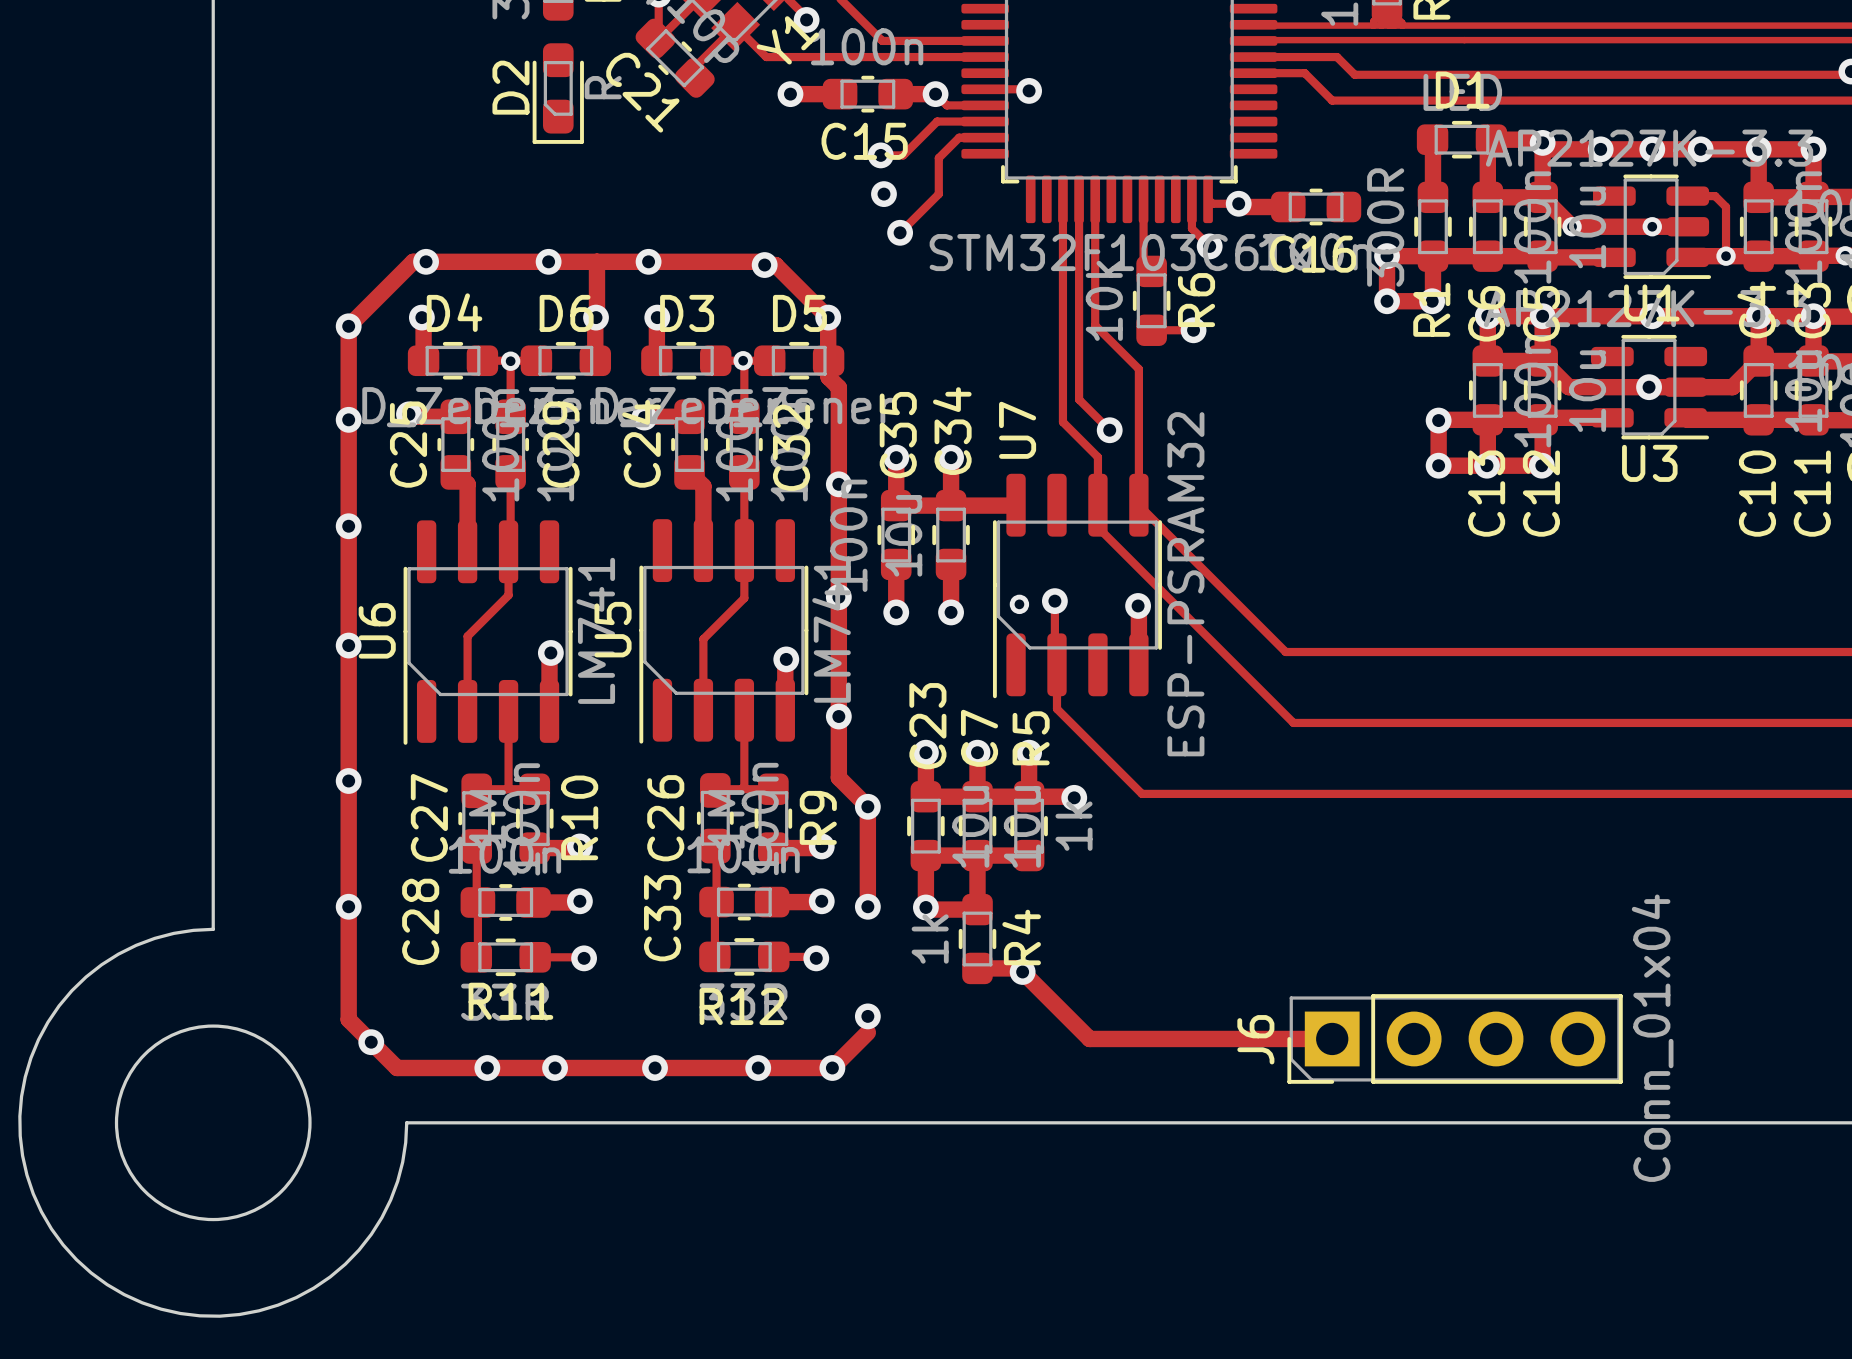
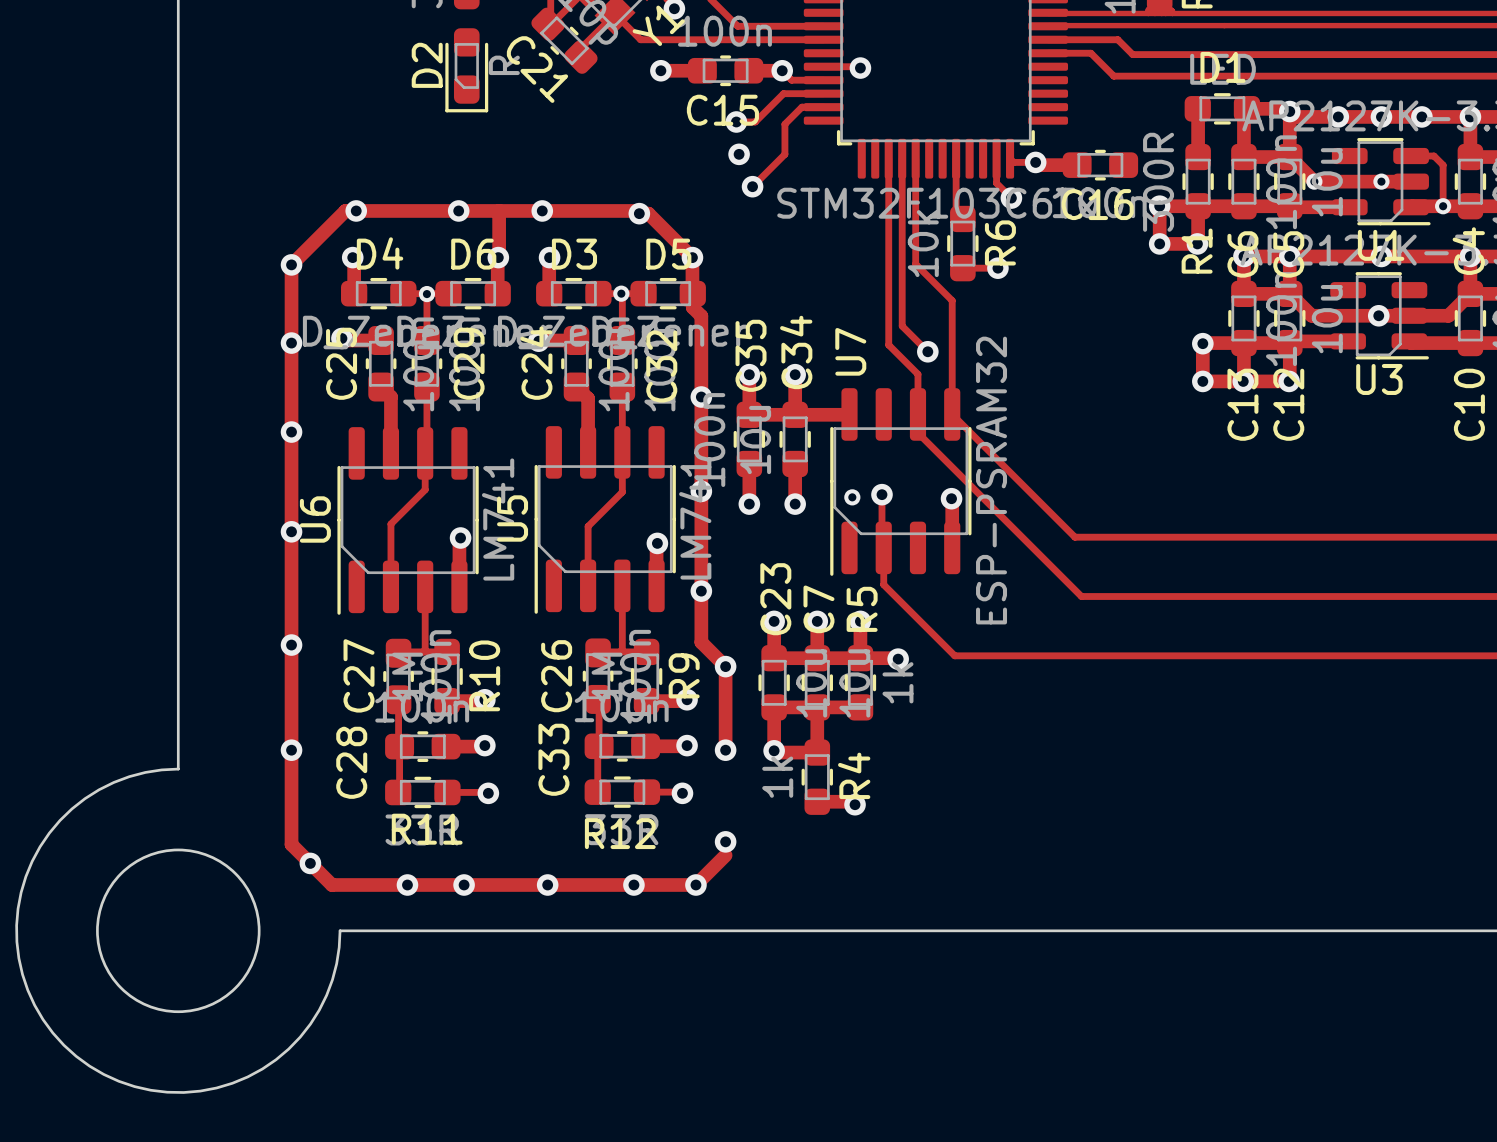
top track: (1022, 971) (1089, 1038) (1332, 1038) -> none
J6: Conn_01x04 (1455, 1038) -> none

